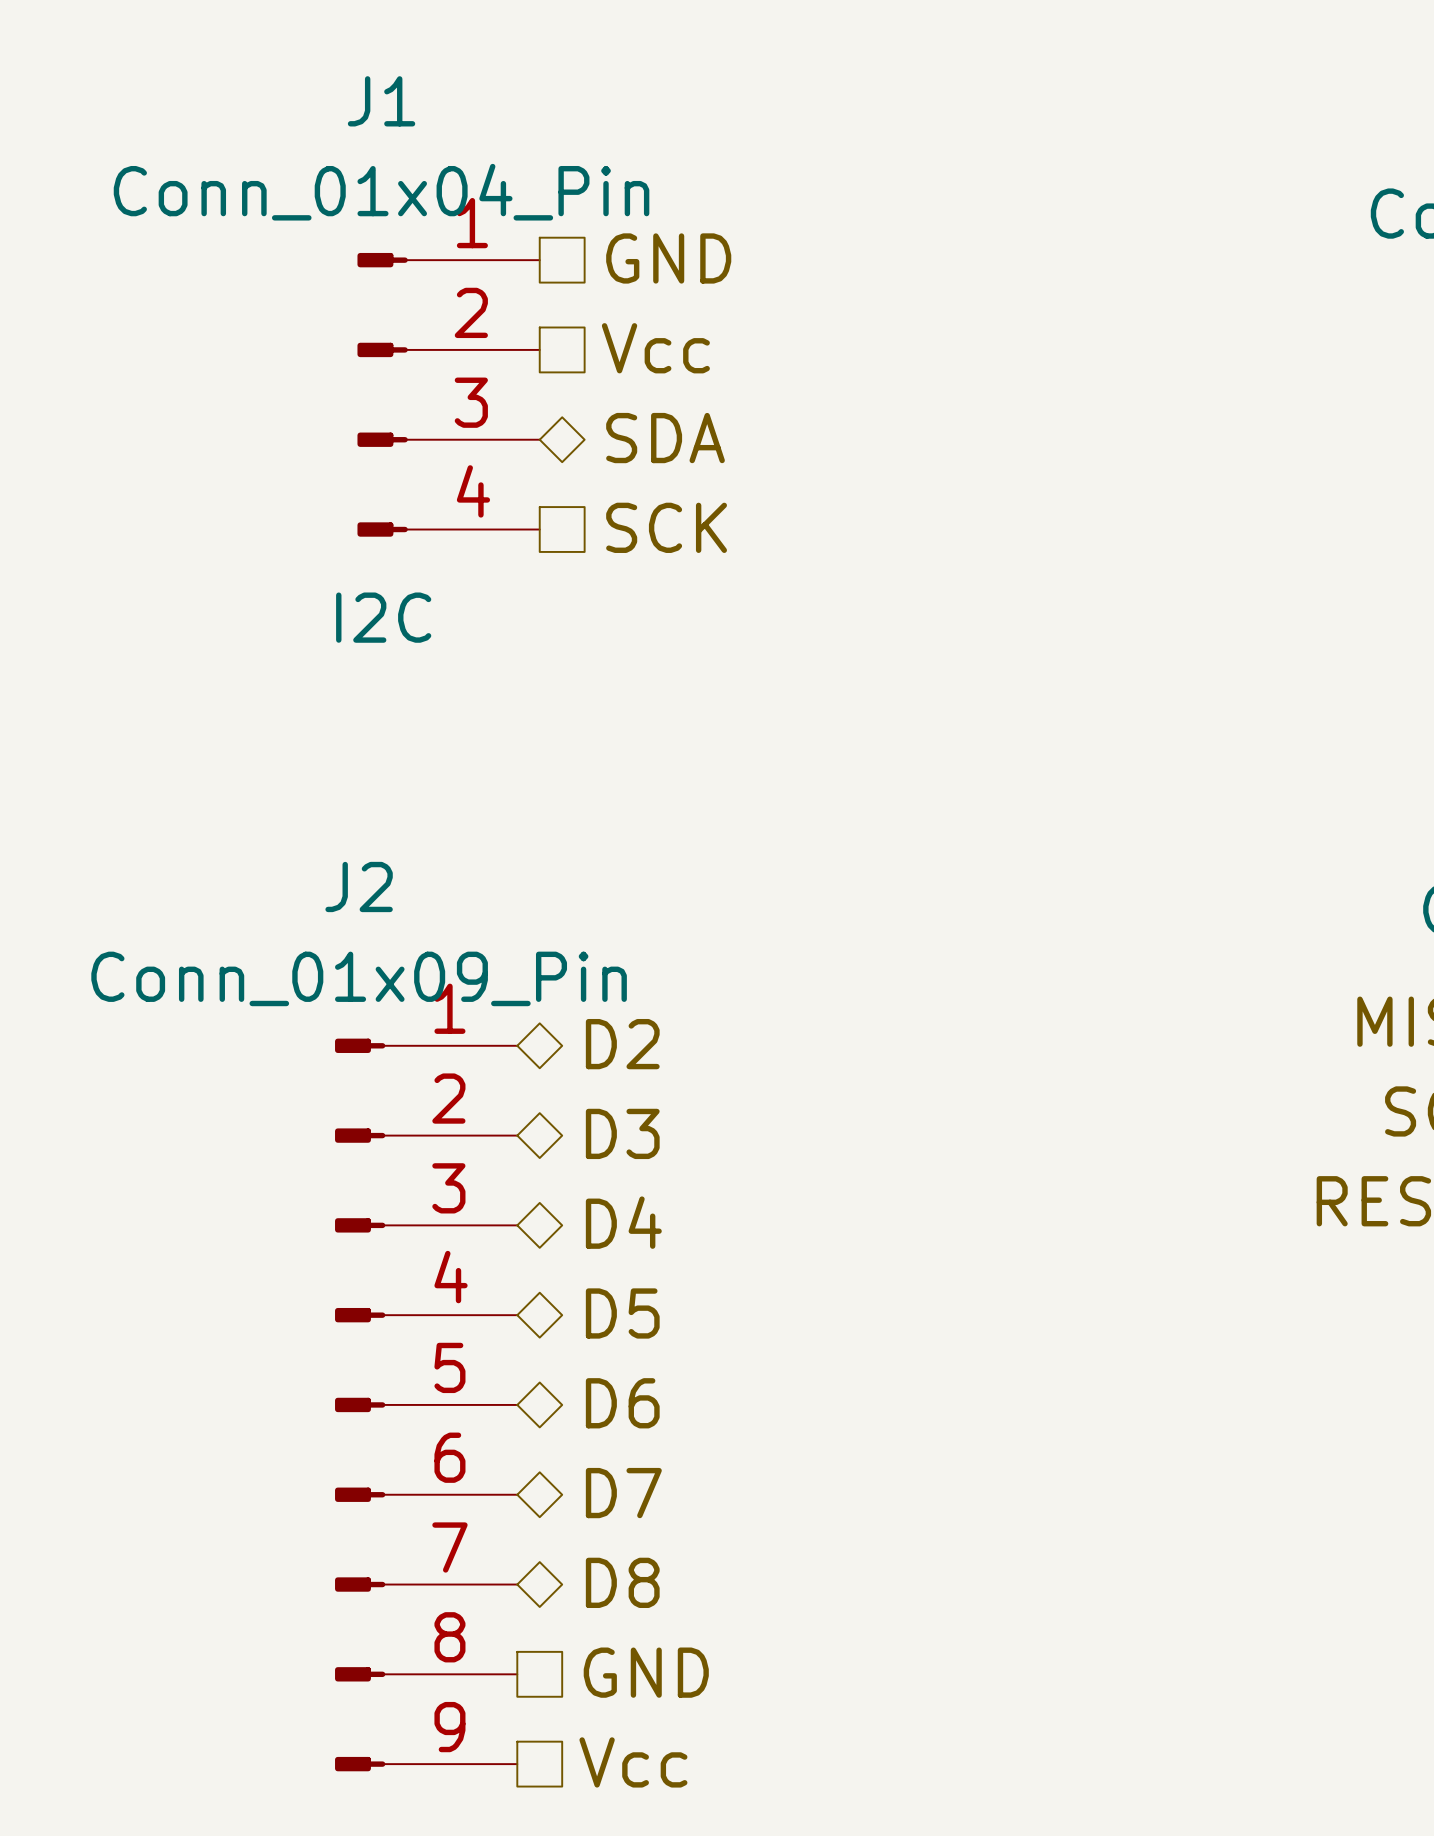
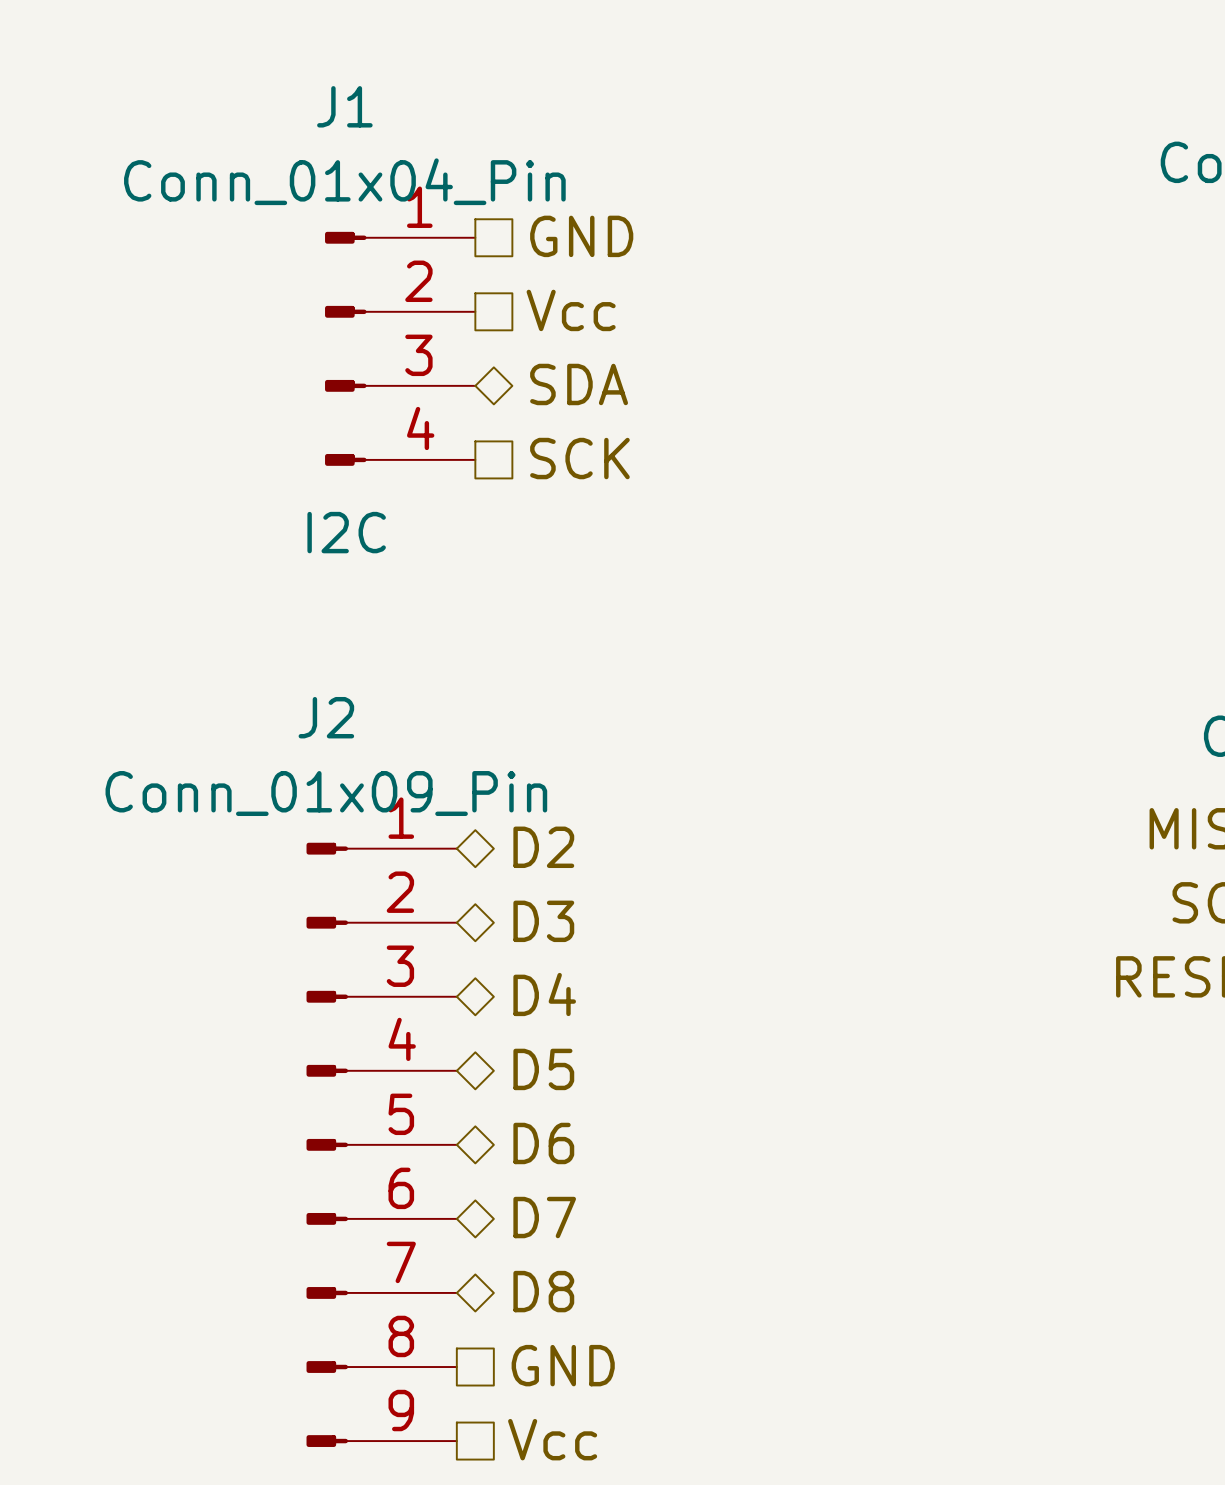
hierarchical label position: GND (668, 258) -> GND (581, 236)
hierarchical label position: Vcc (655, 348) -> Vcc (571, 310)
J1 position: (448, 394) -> (400, 348)
hierarchical label position: SDA (665, 438) -> SDA (579, 384)
hierarchical label position: SCK (666, 527) -> SCK (579, 458)

